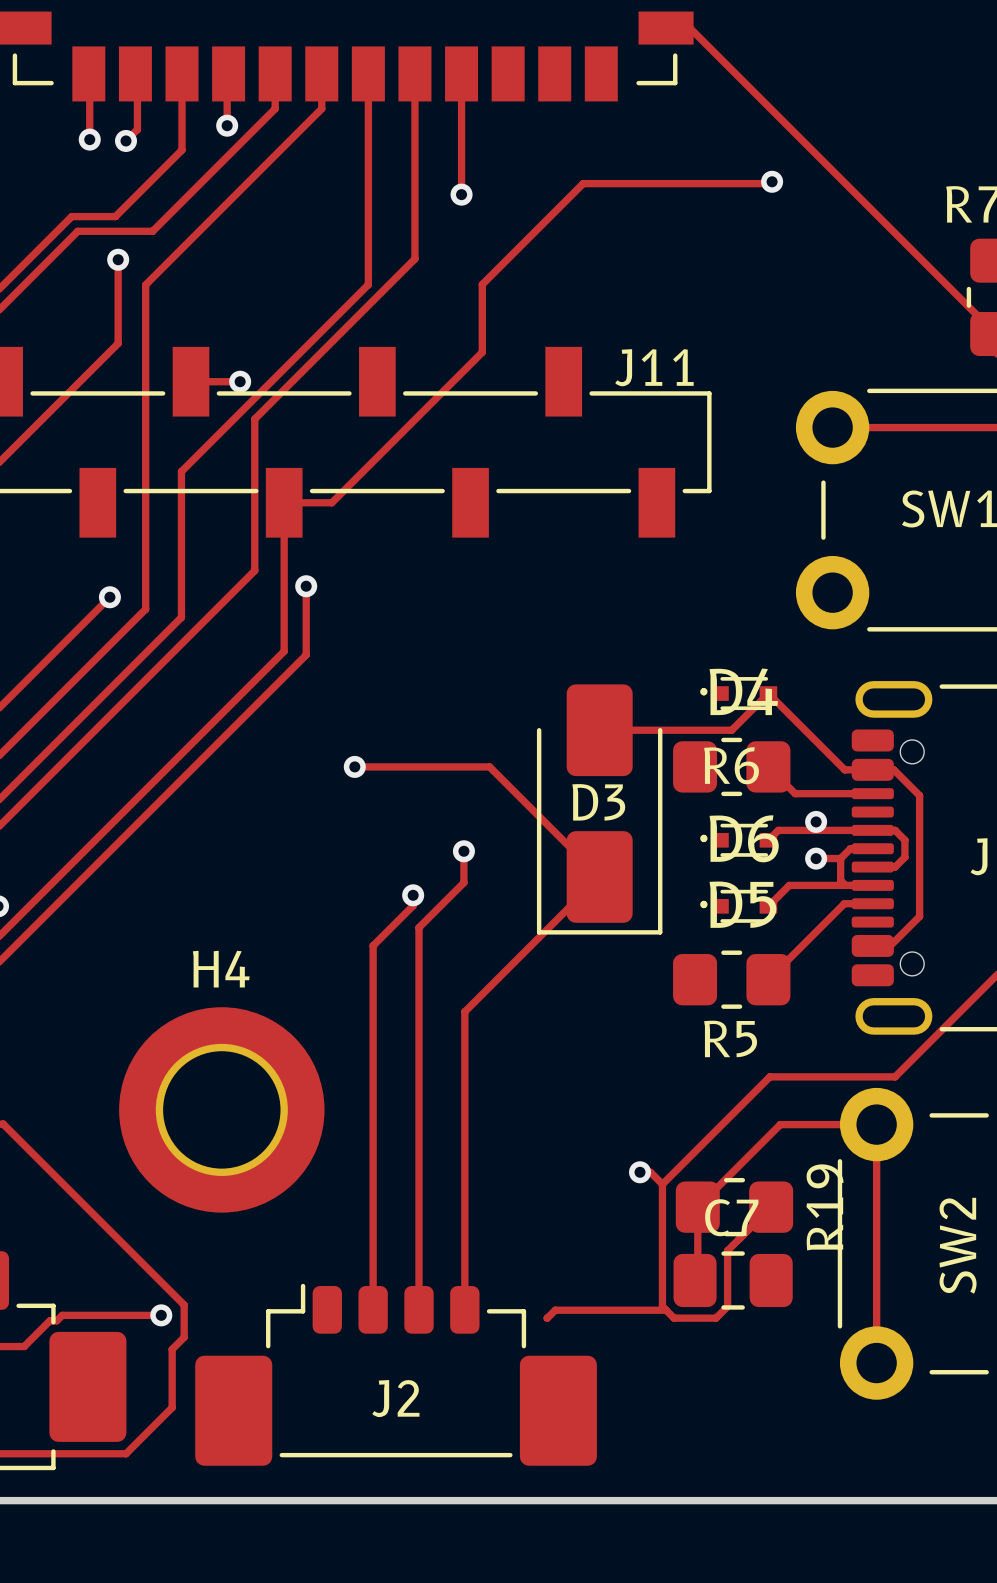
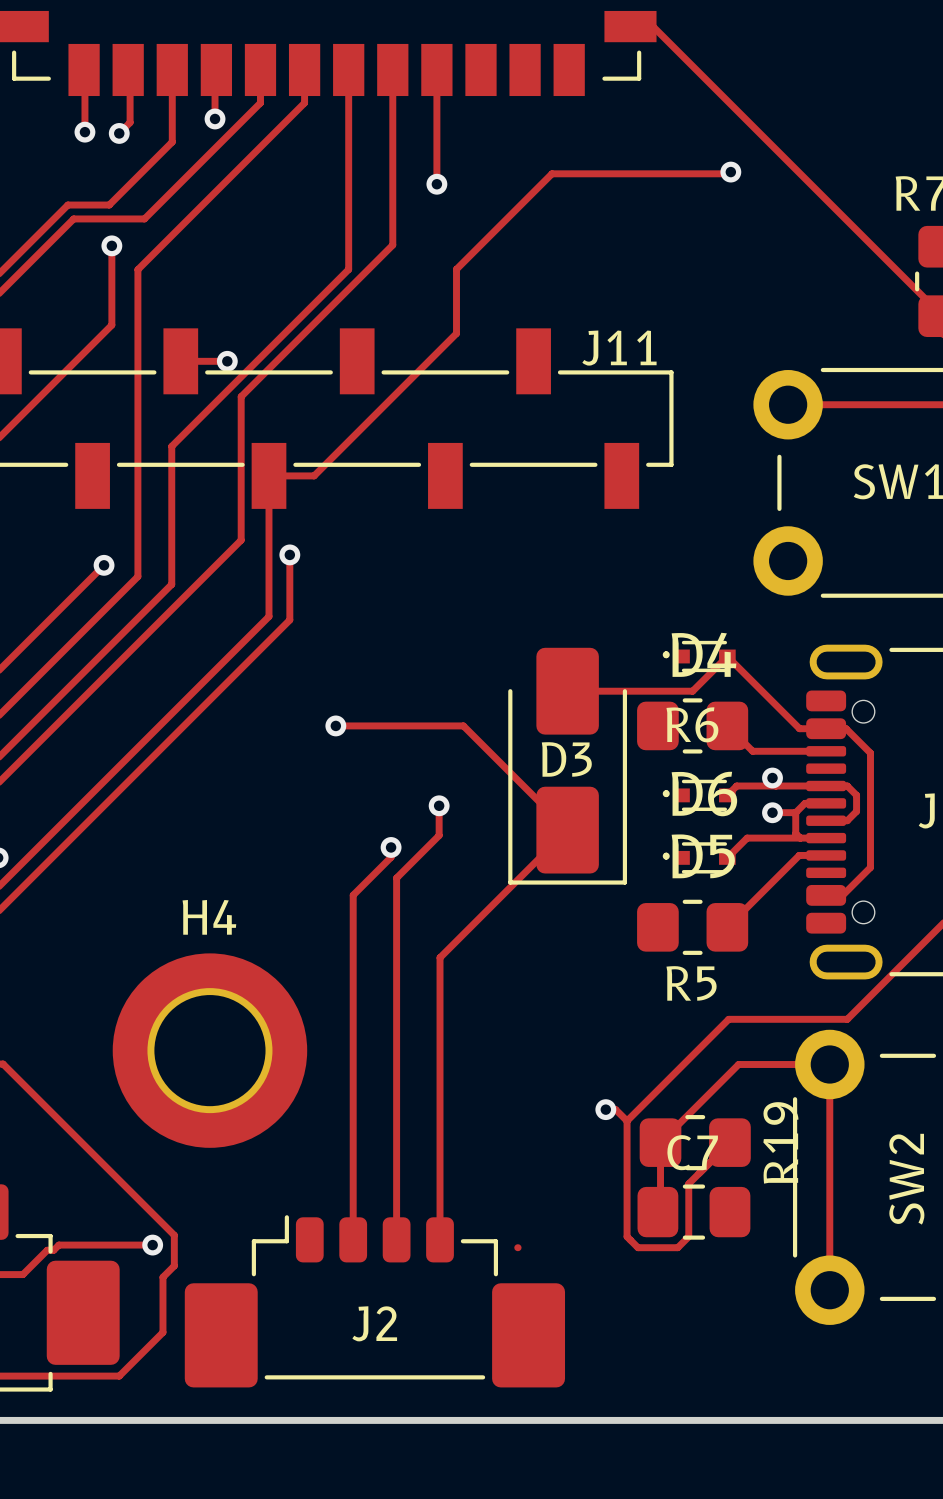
track: (666, 1310) (555, 1310) (547, 1318) -> none

